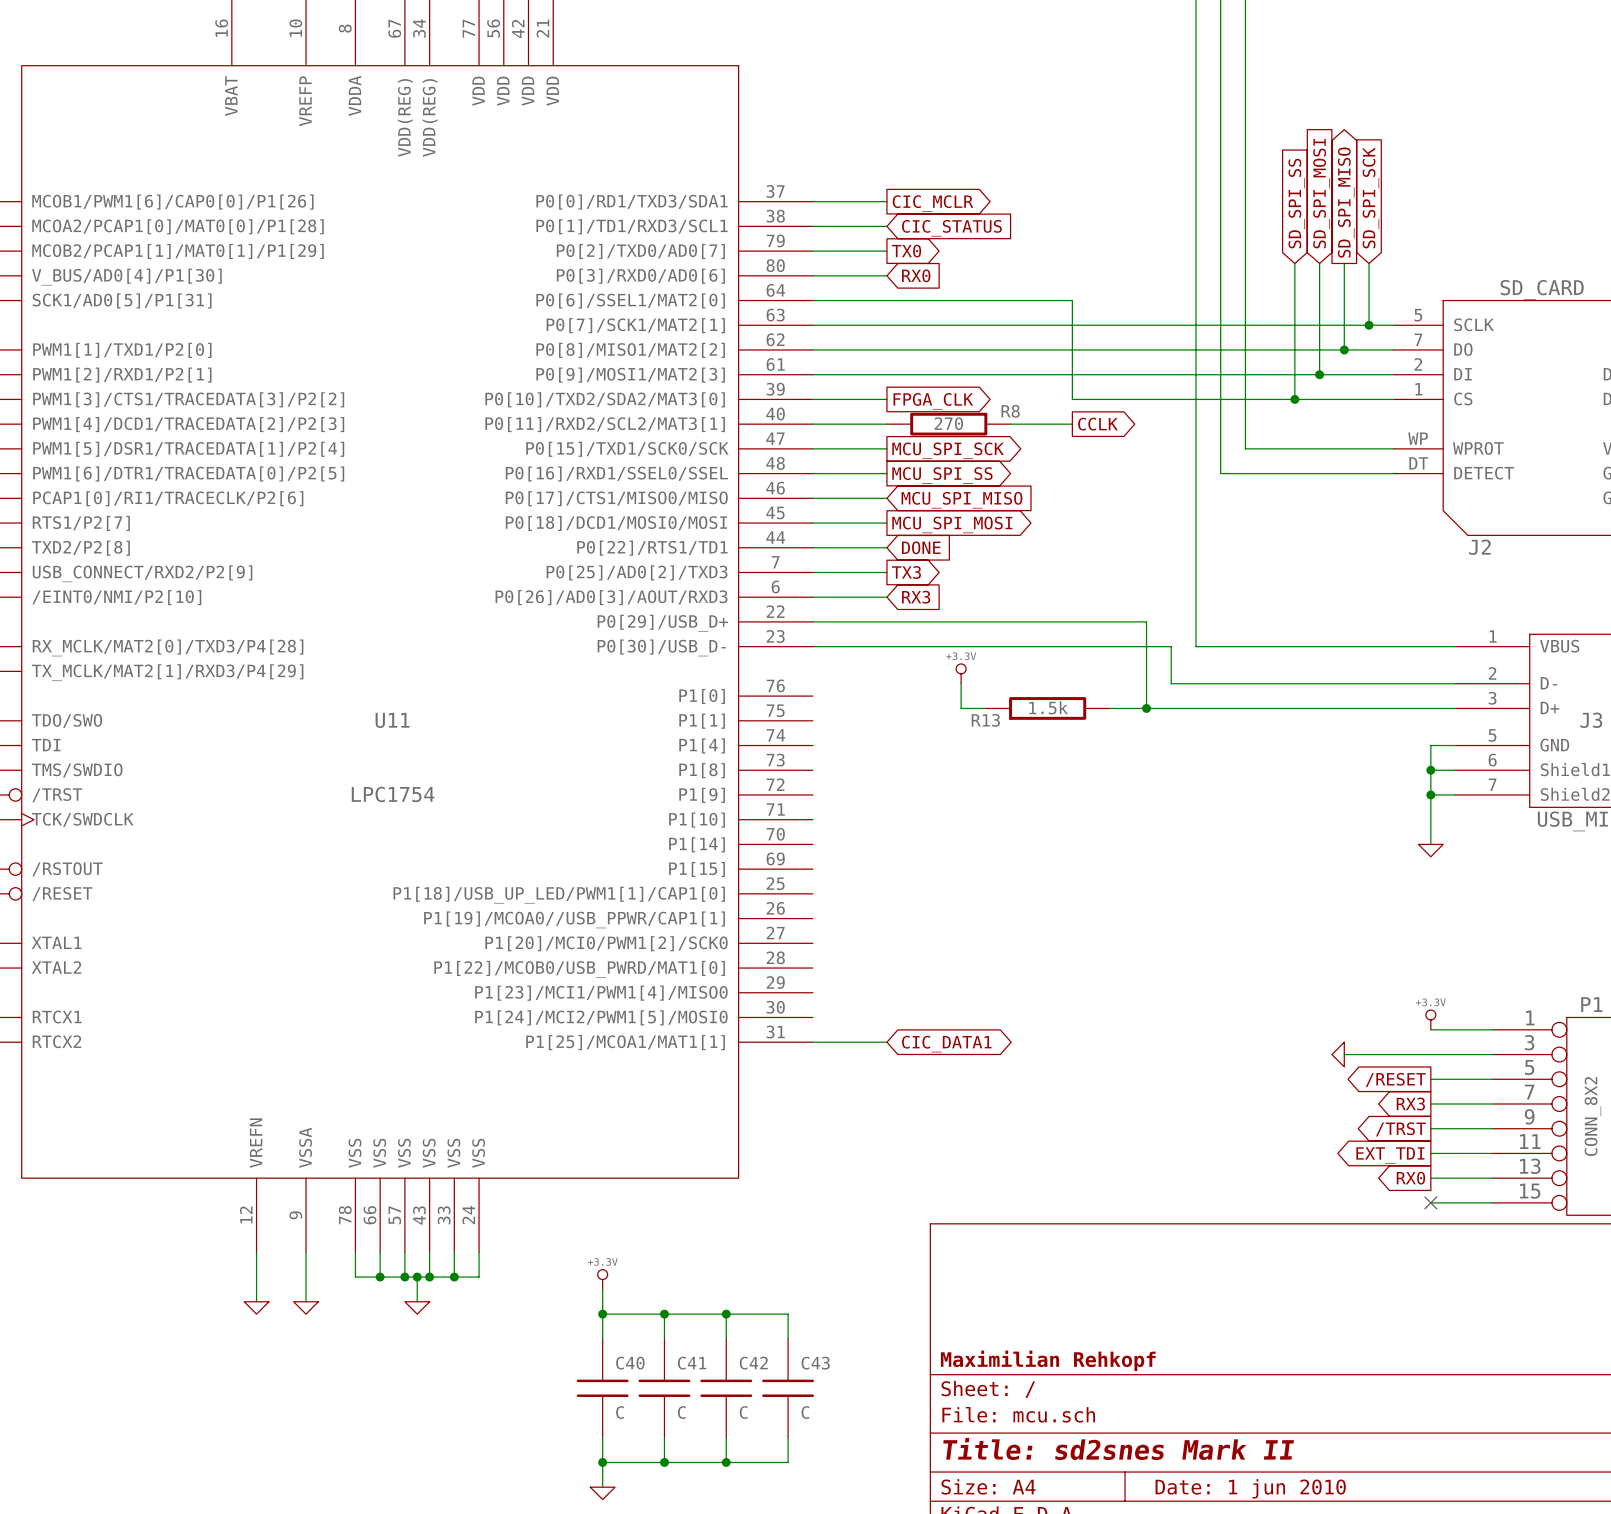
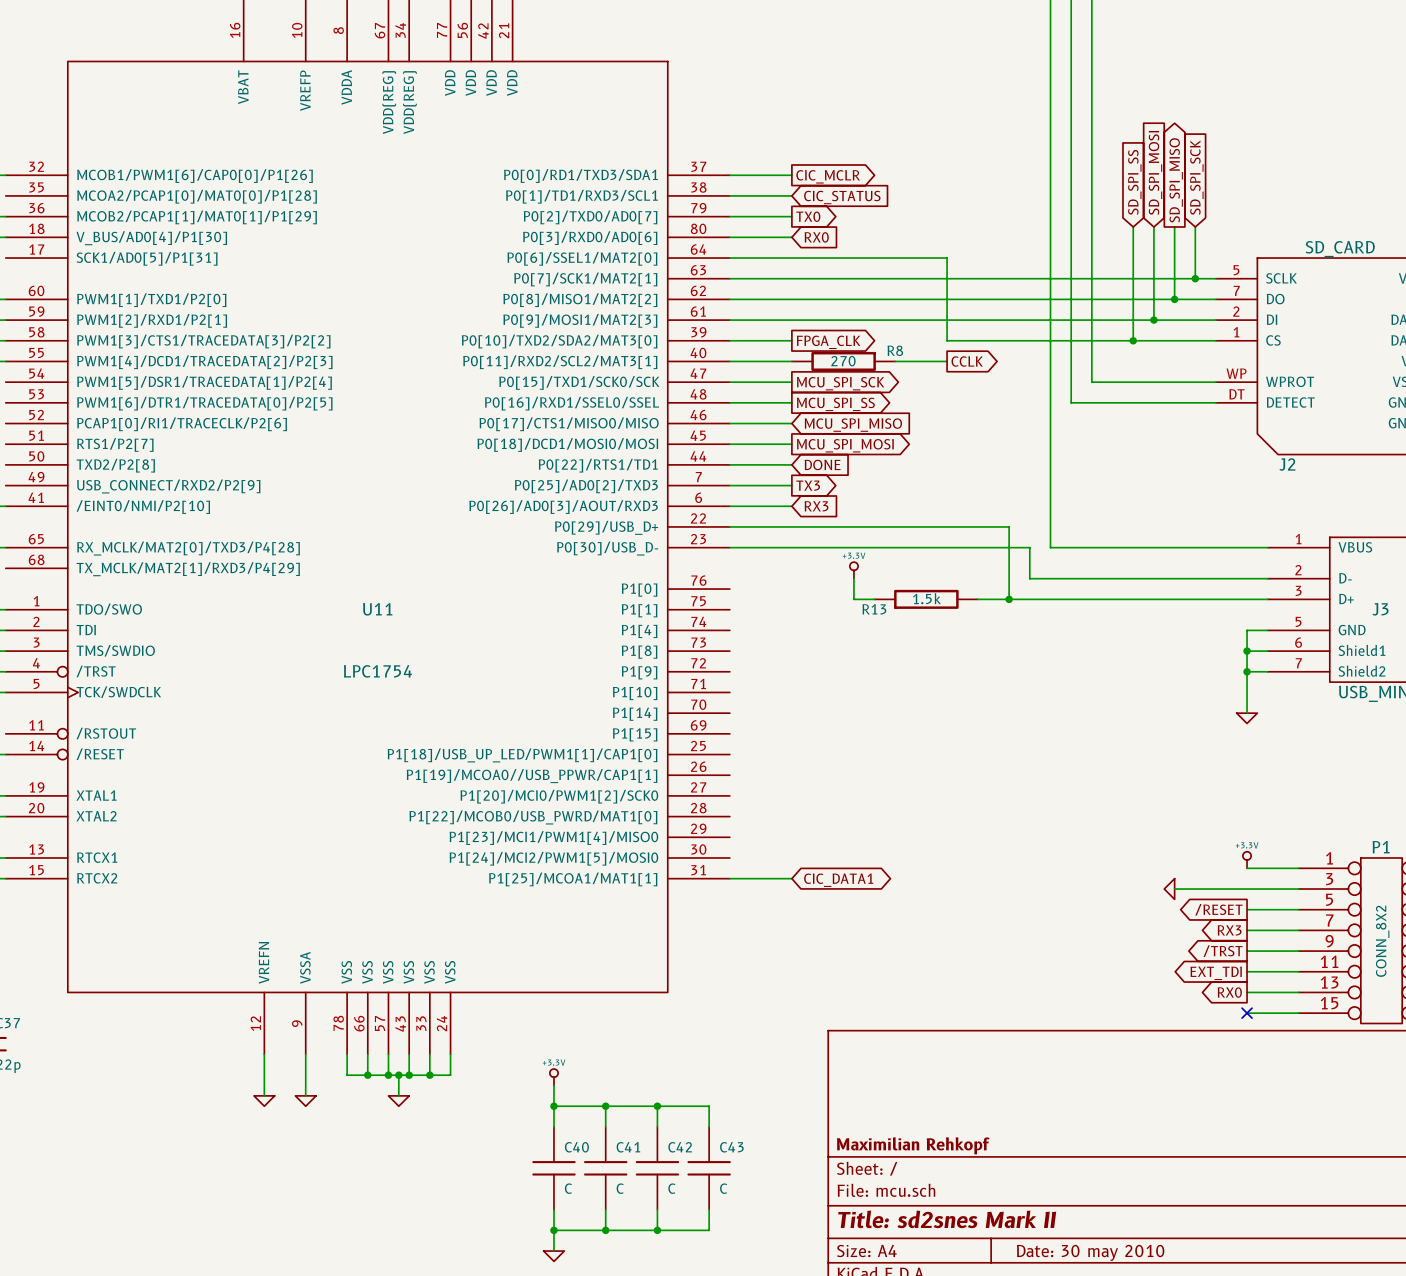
title block: Date: 1 jun 2010 (1250, 1488) -> Date: 30 may 2010 (1090, 1252)

